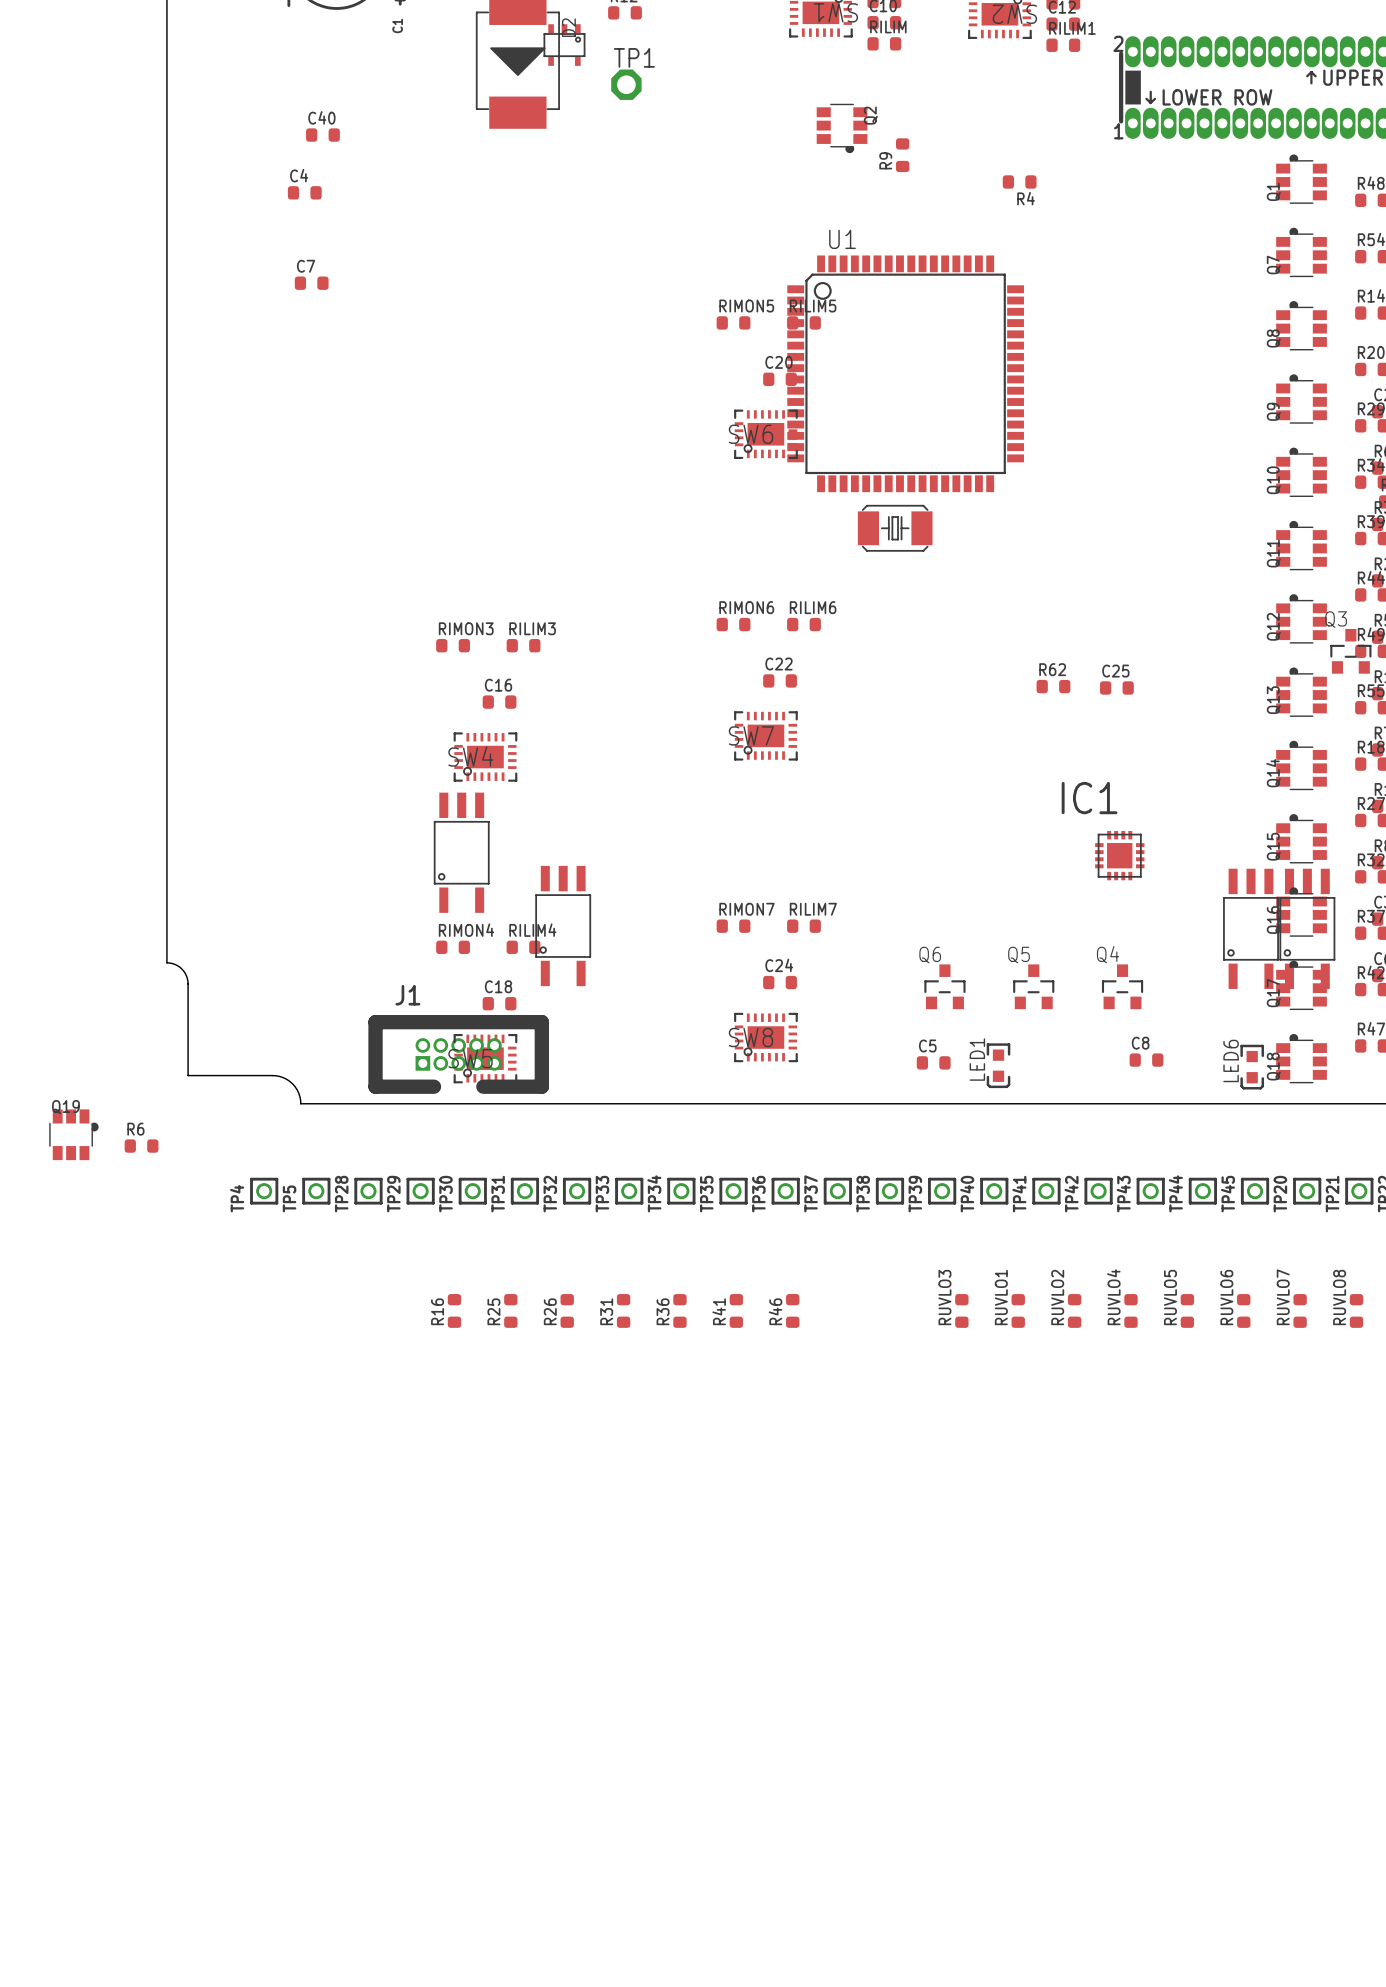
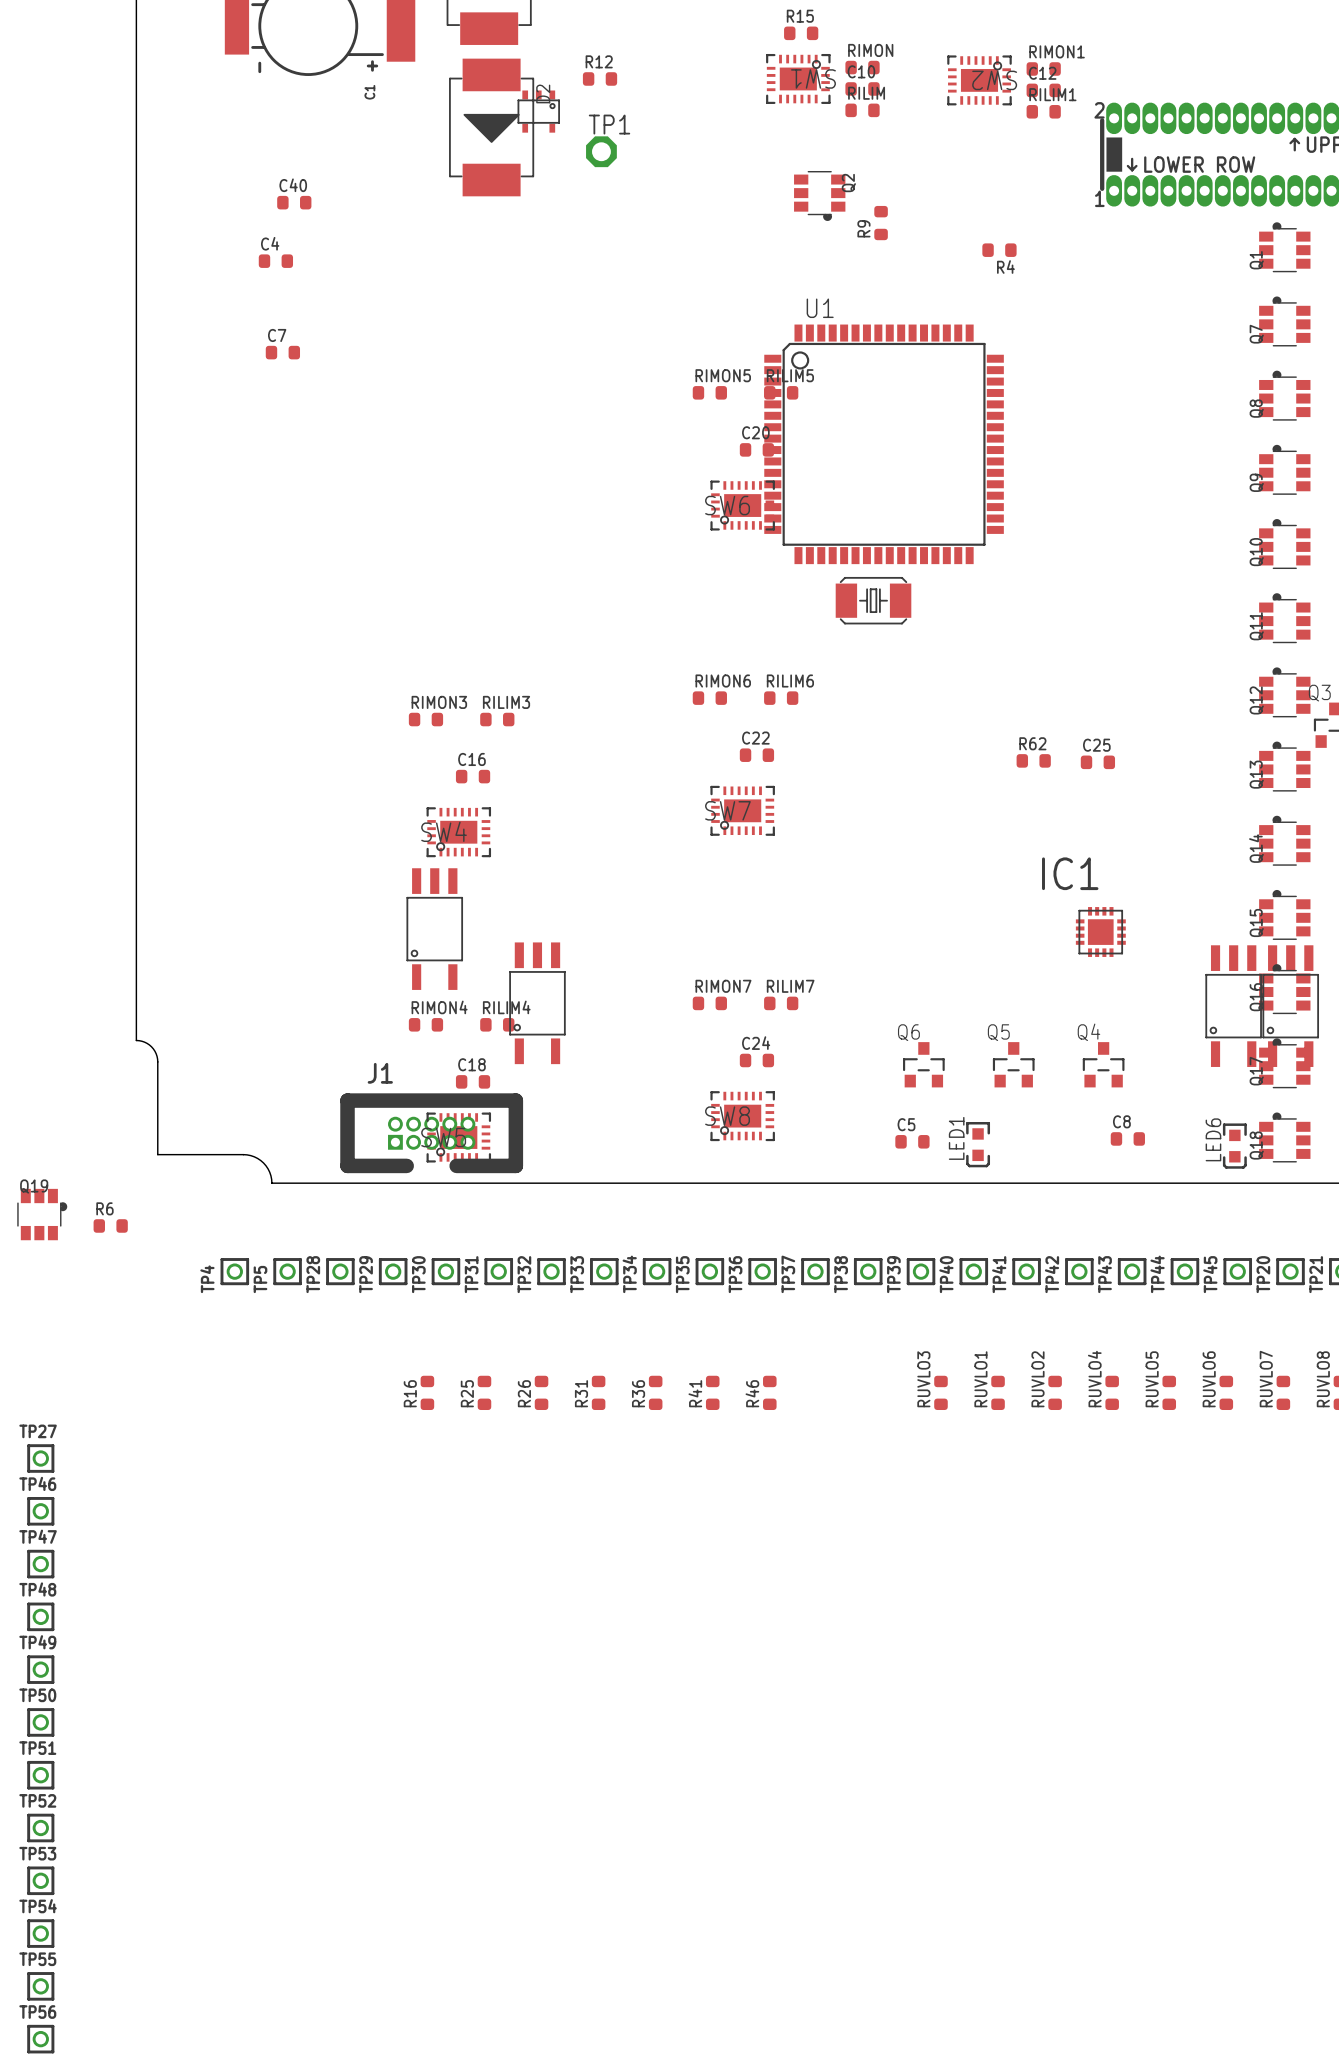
TP27: none -> (40, 1458)
TP46: none -> (40, 1511)
TP47: none -> (40, 1564)
TP48: none -> (40, 1616)
TP49: none -> (40, 1669)
TP50: none -> (40, 1722)
TP51: none -> (40, 1775)
TP52: none -> (40, 1828)
TP53: none -> (40, 1880)
TP54: none -> (40, 1933)
TP55: none -> (40, 1986)
TP56: none -> (40, 2039)

